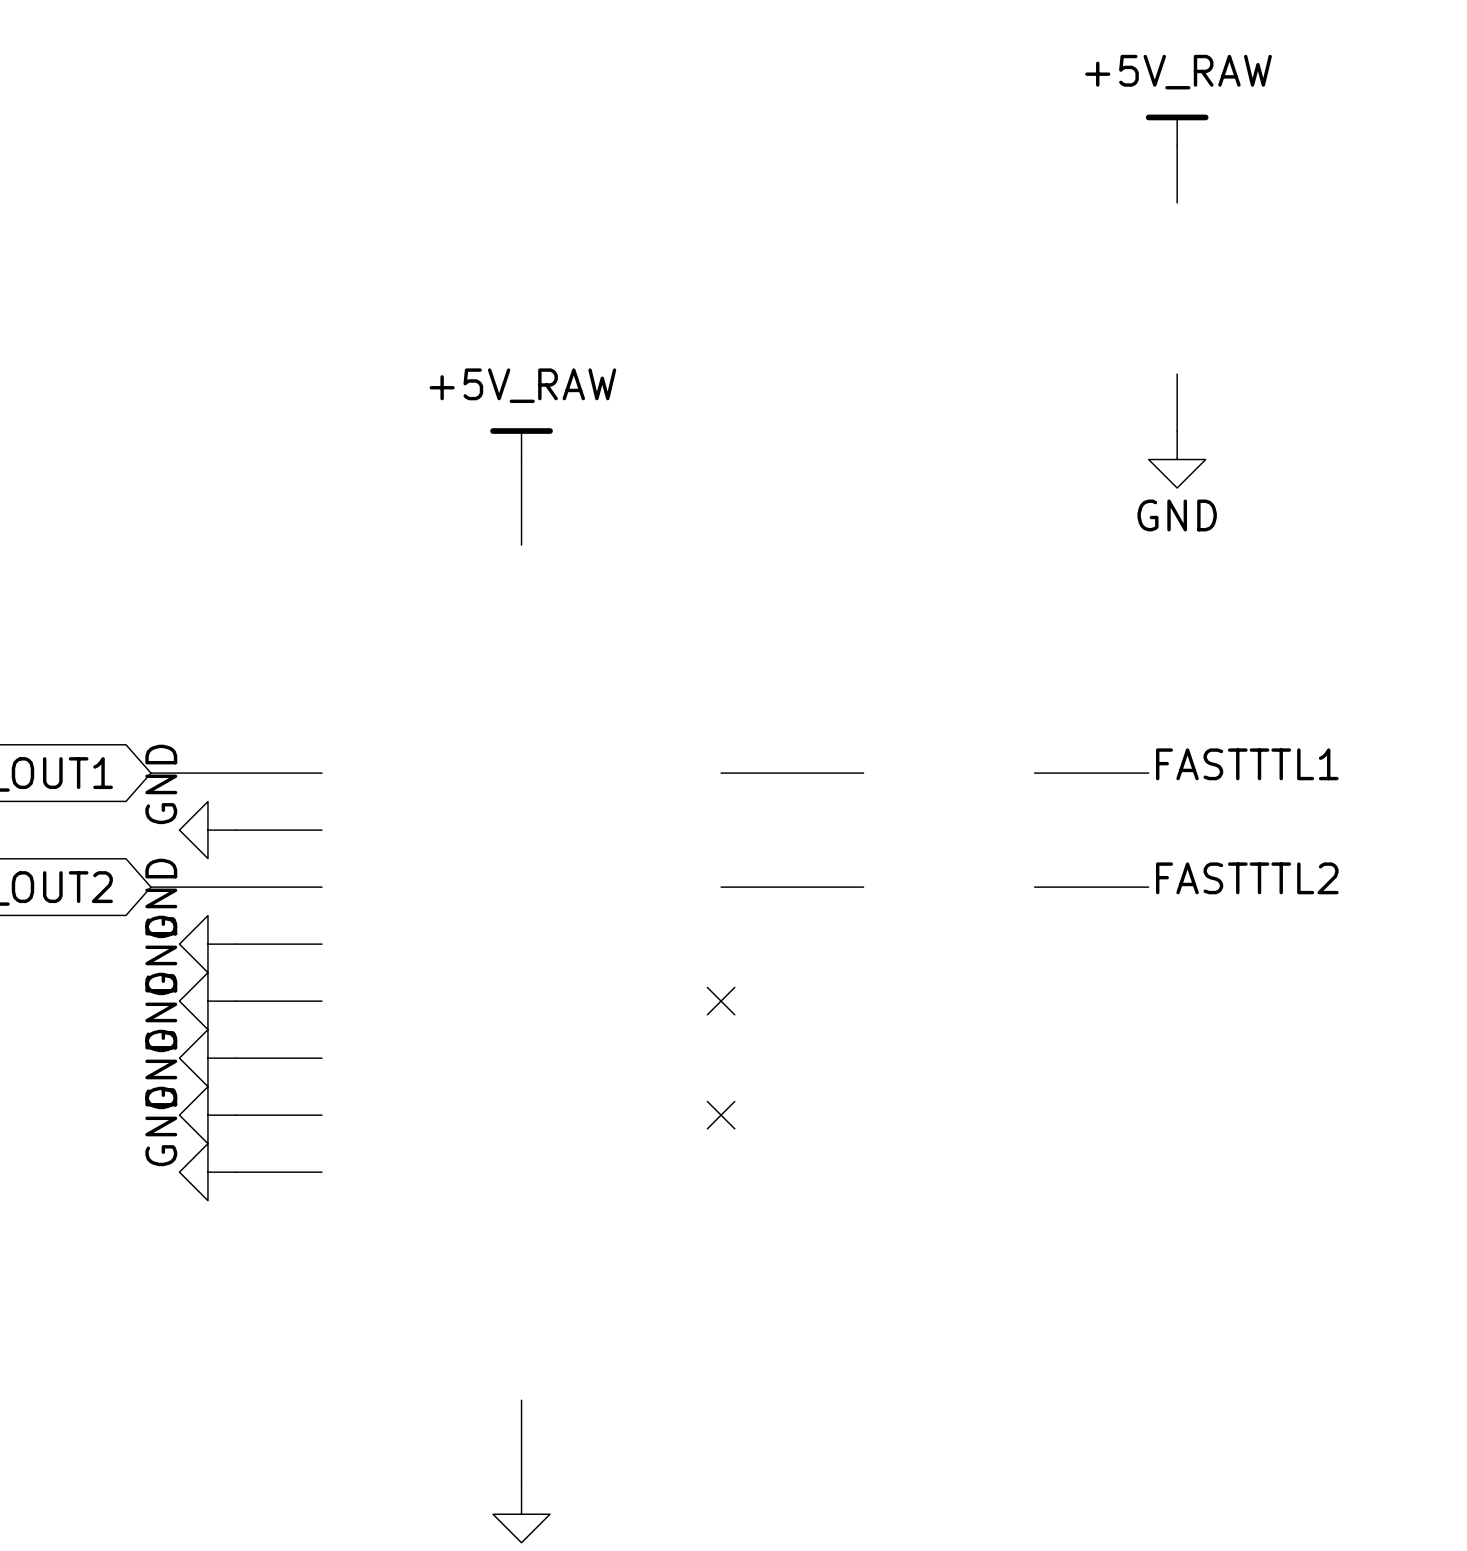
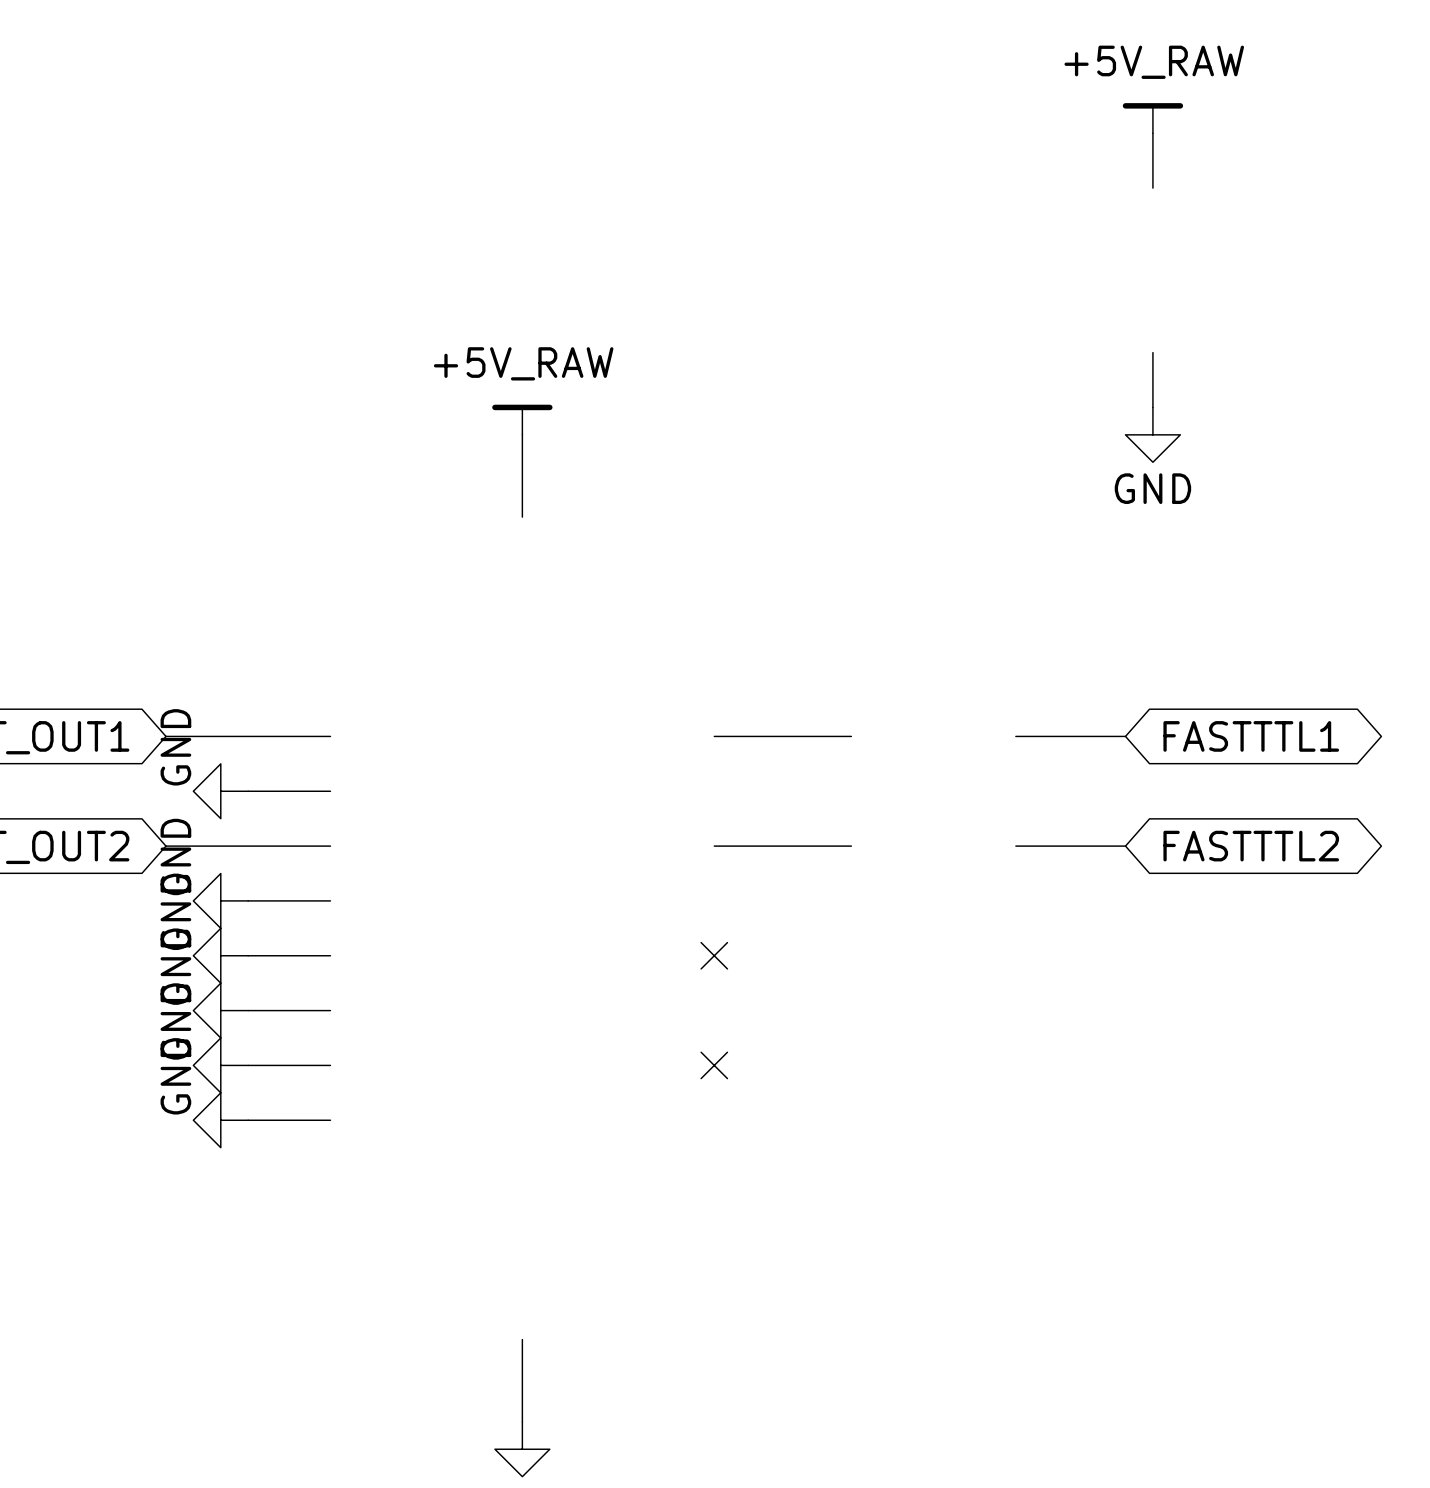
label: FASTTTL1 (1247, 764) -> none
global label: none -> FASTTTL1 (1251, 736)
label: FASTTTL2 (1247, 878) -> none
global label: none -> FASTTTL2 (1251, 846)

